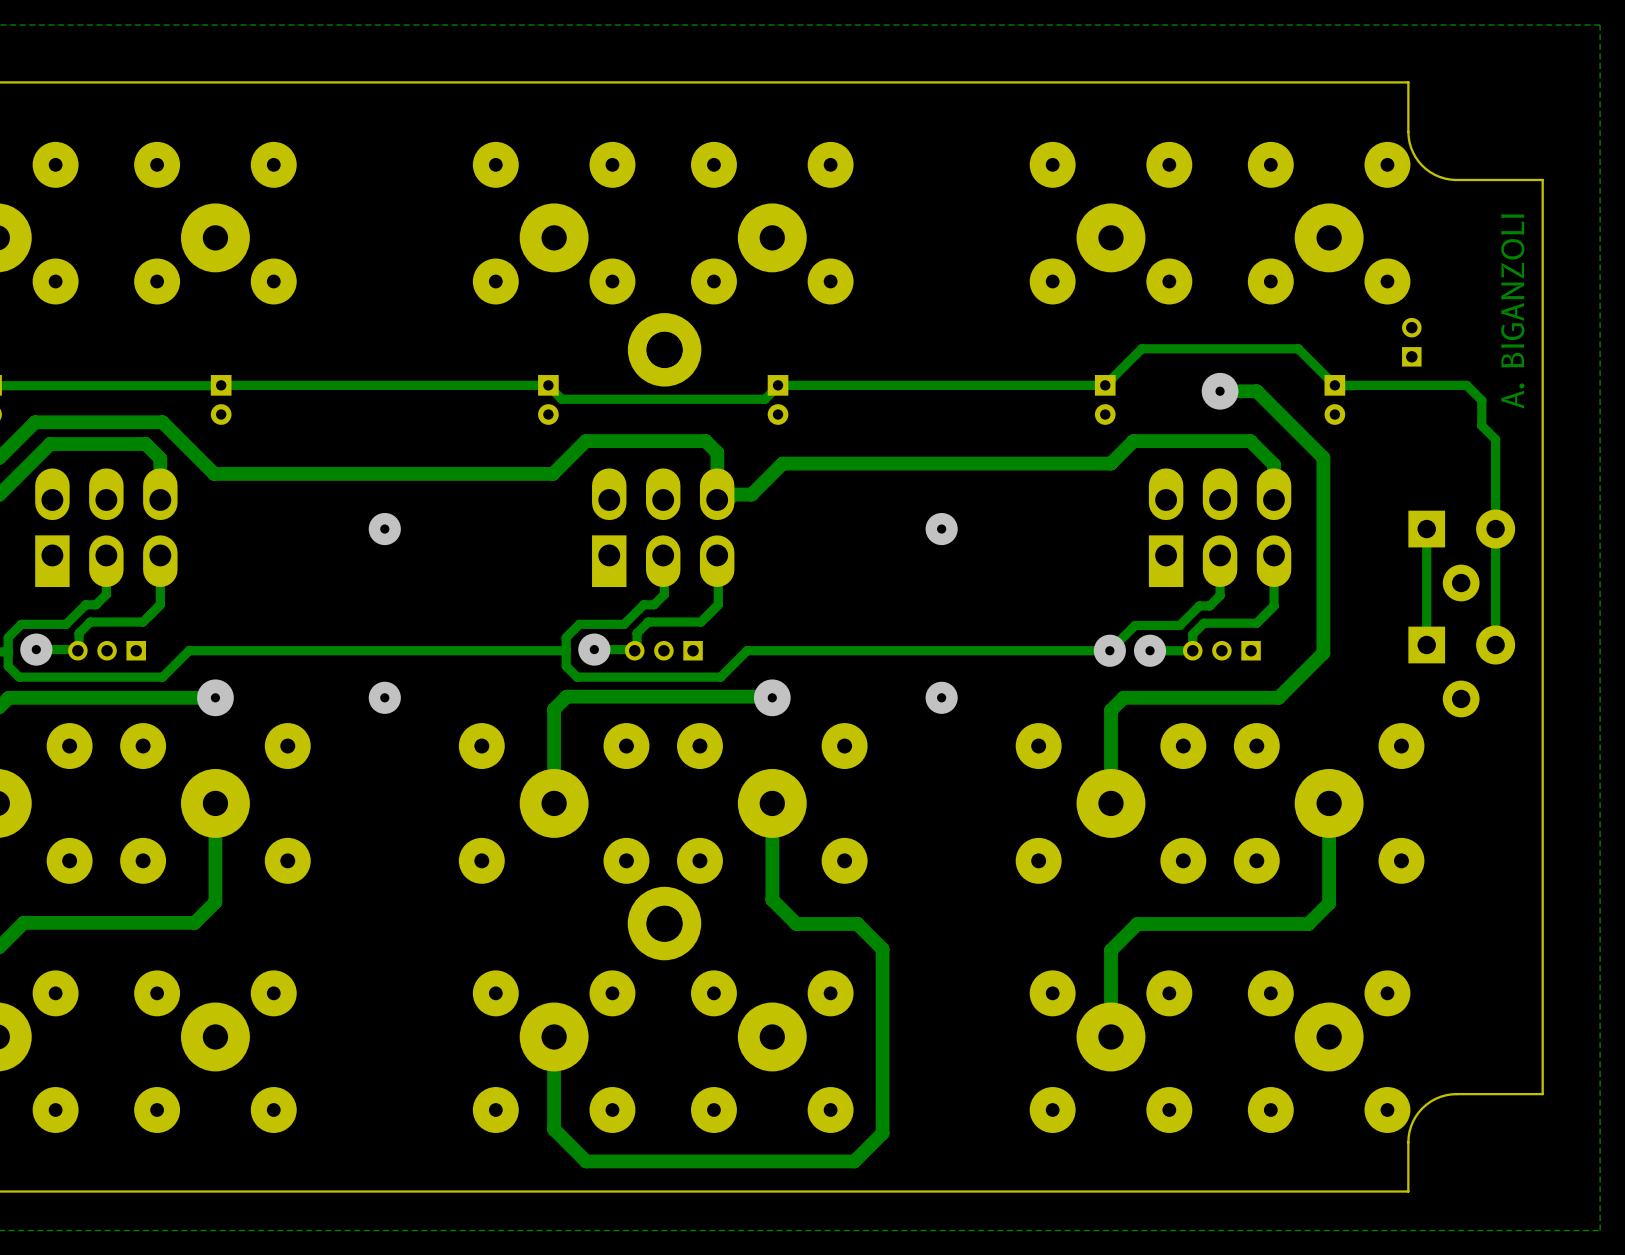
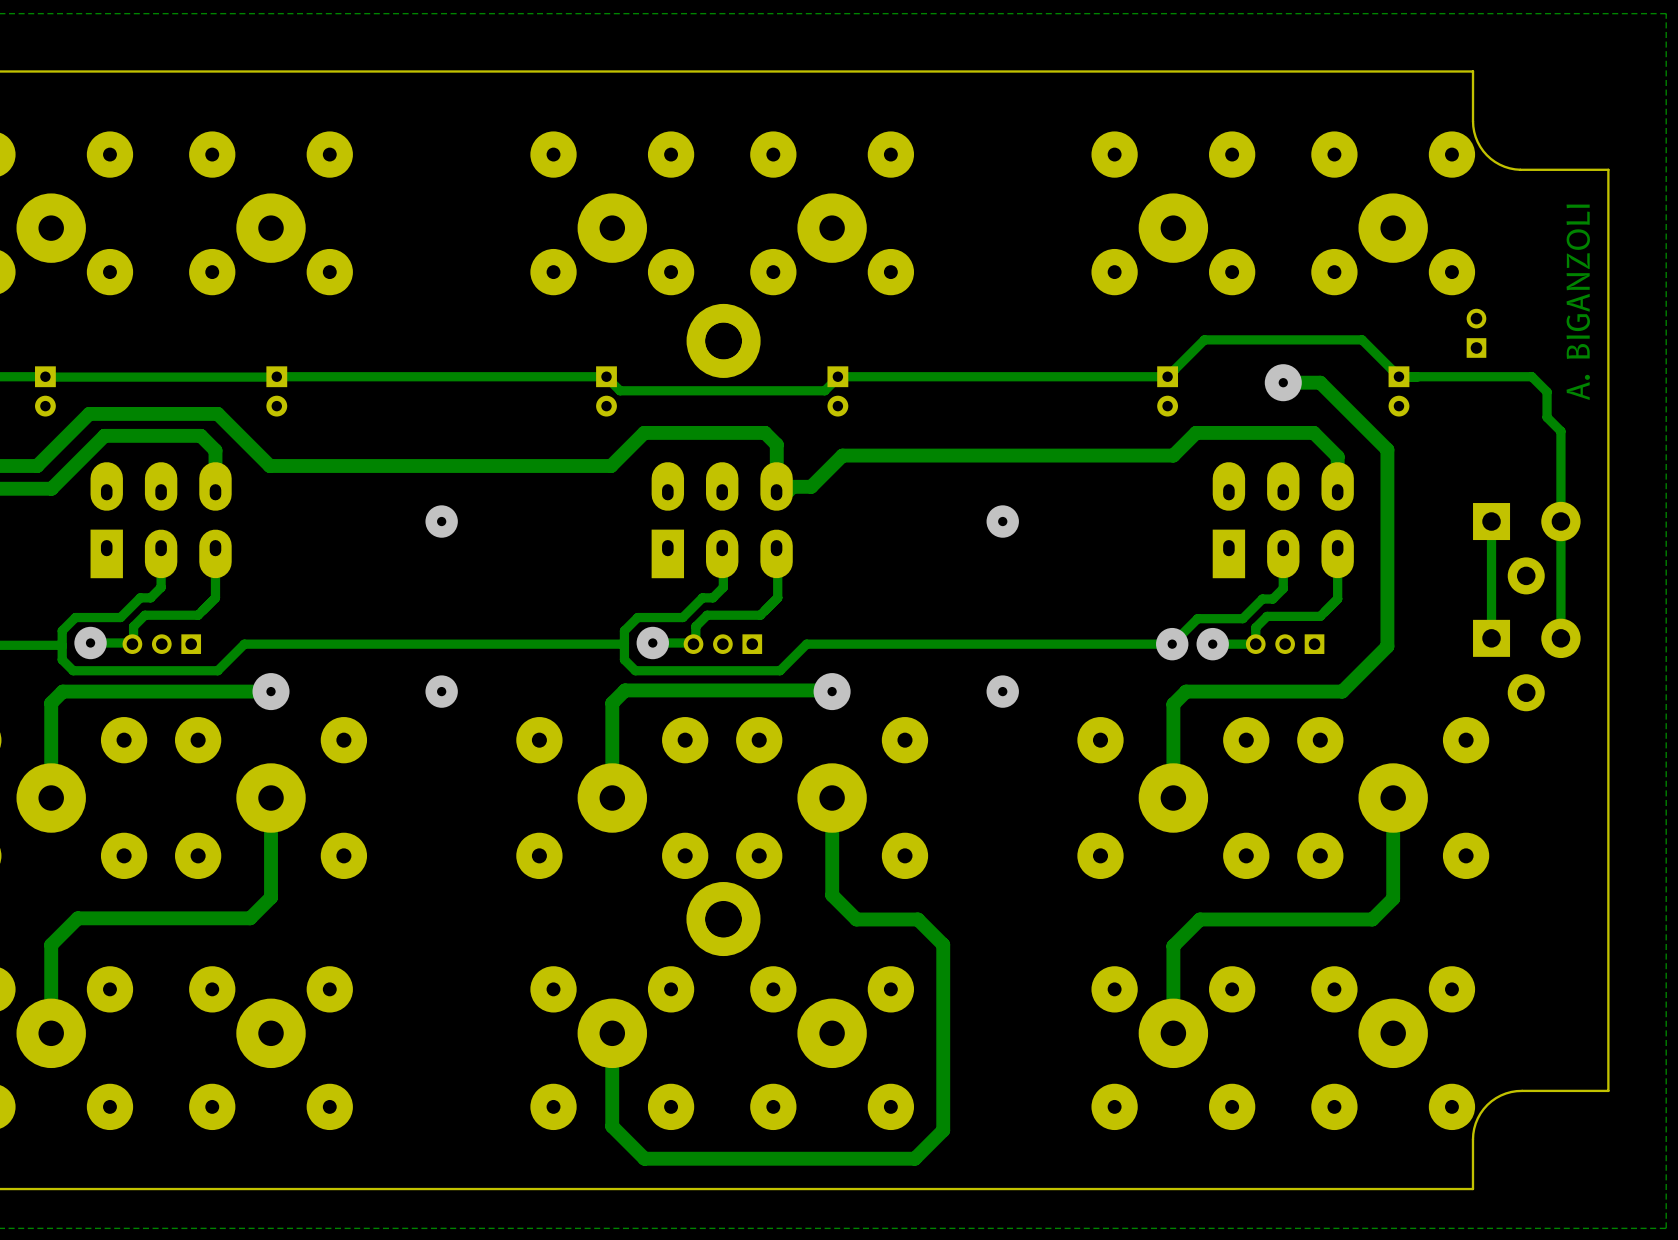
part footprint: [35, 468, 178, 588] -> [90, 462, 232, 579]
part footprint: [592, 468, 735, 588] -> [651, 462, 793, 579]
part footprint: [1148, 468, 1292, 588] -> [1212, 462, 1354, 579]

